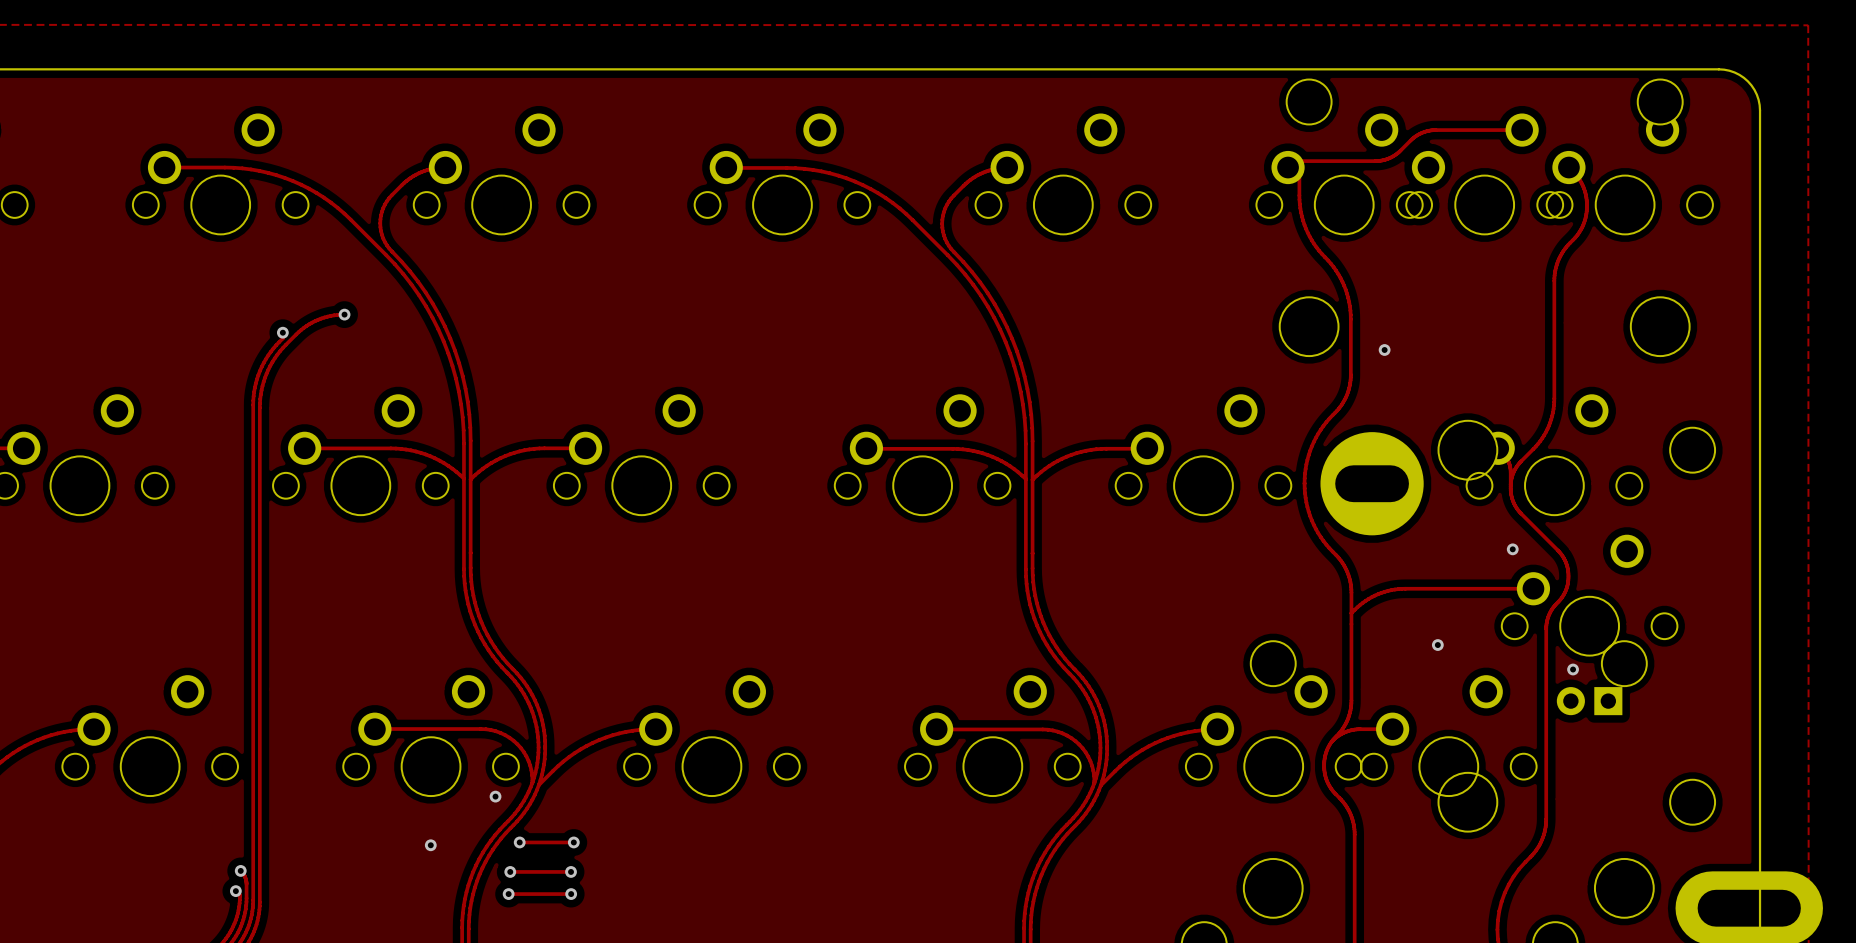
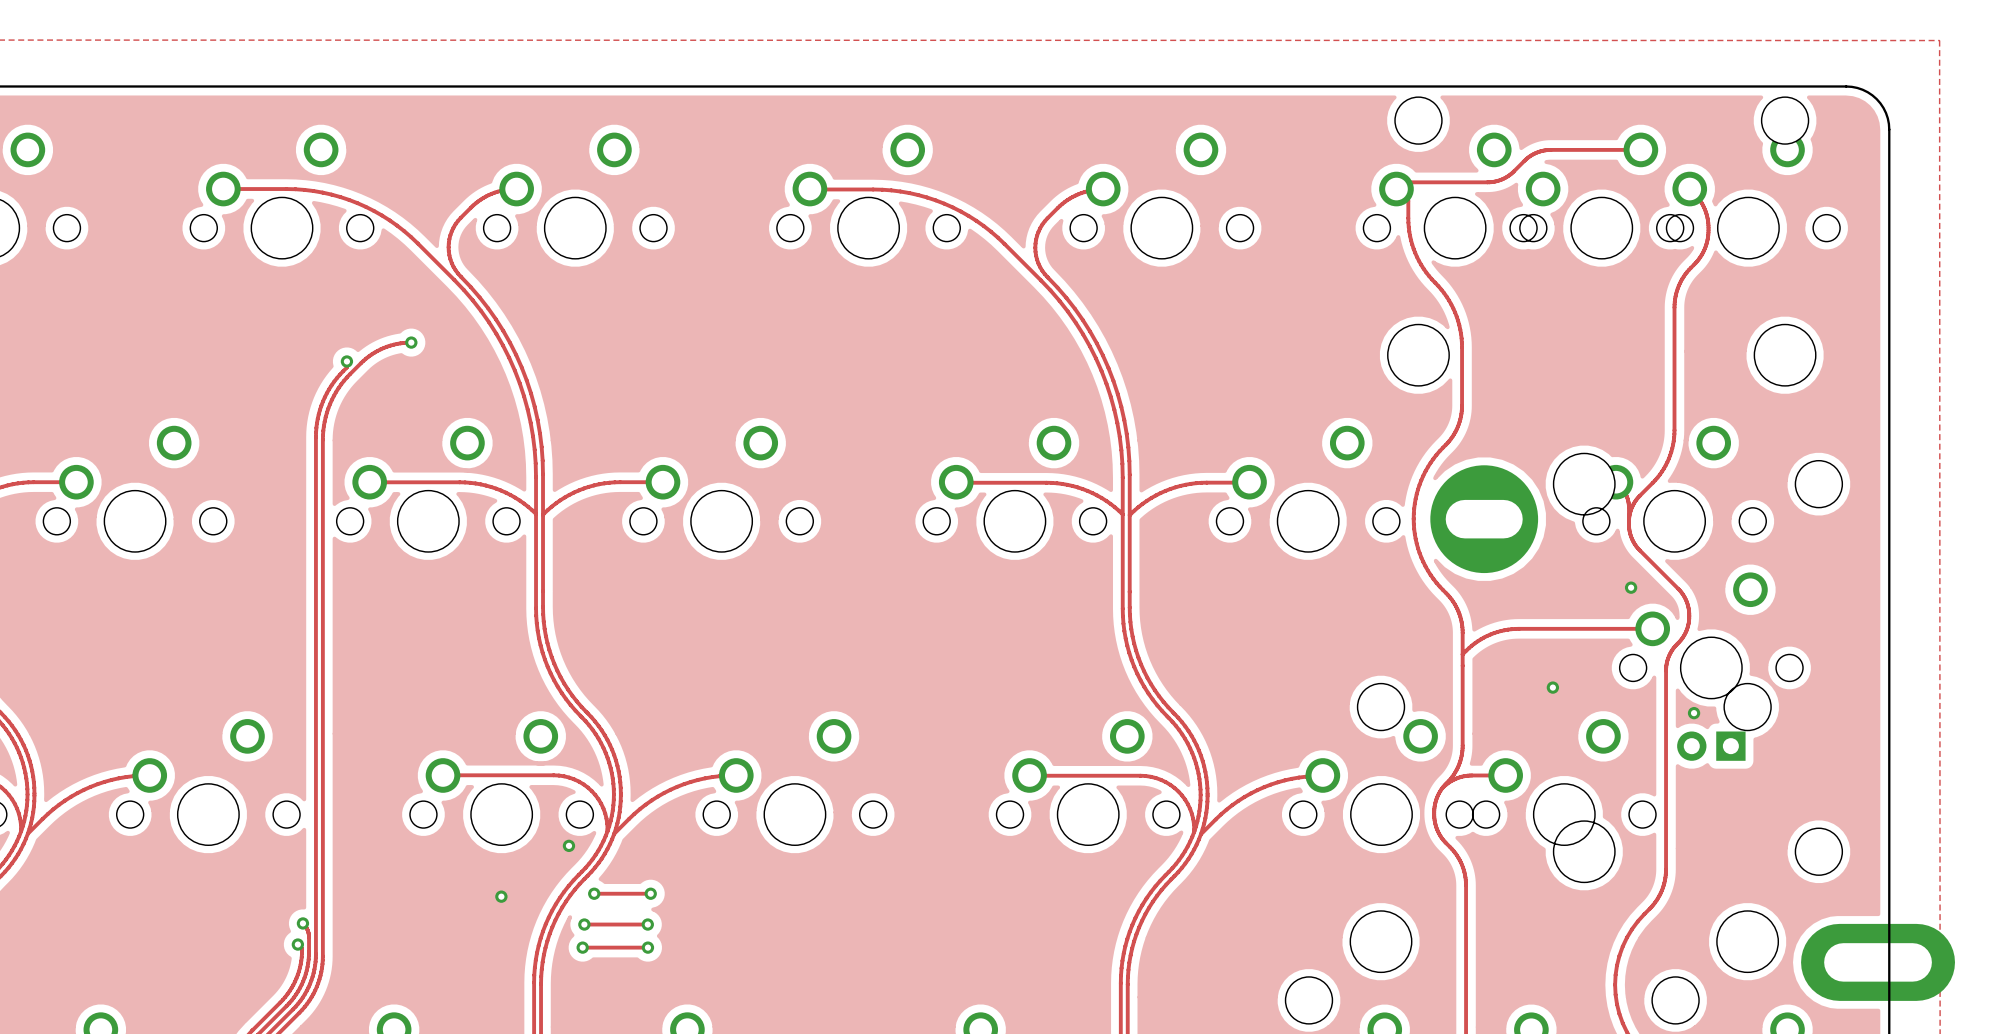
via: (1384, 349) -> none

